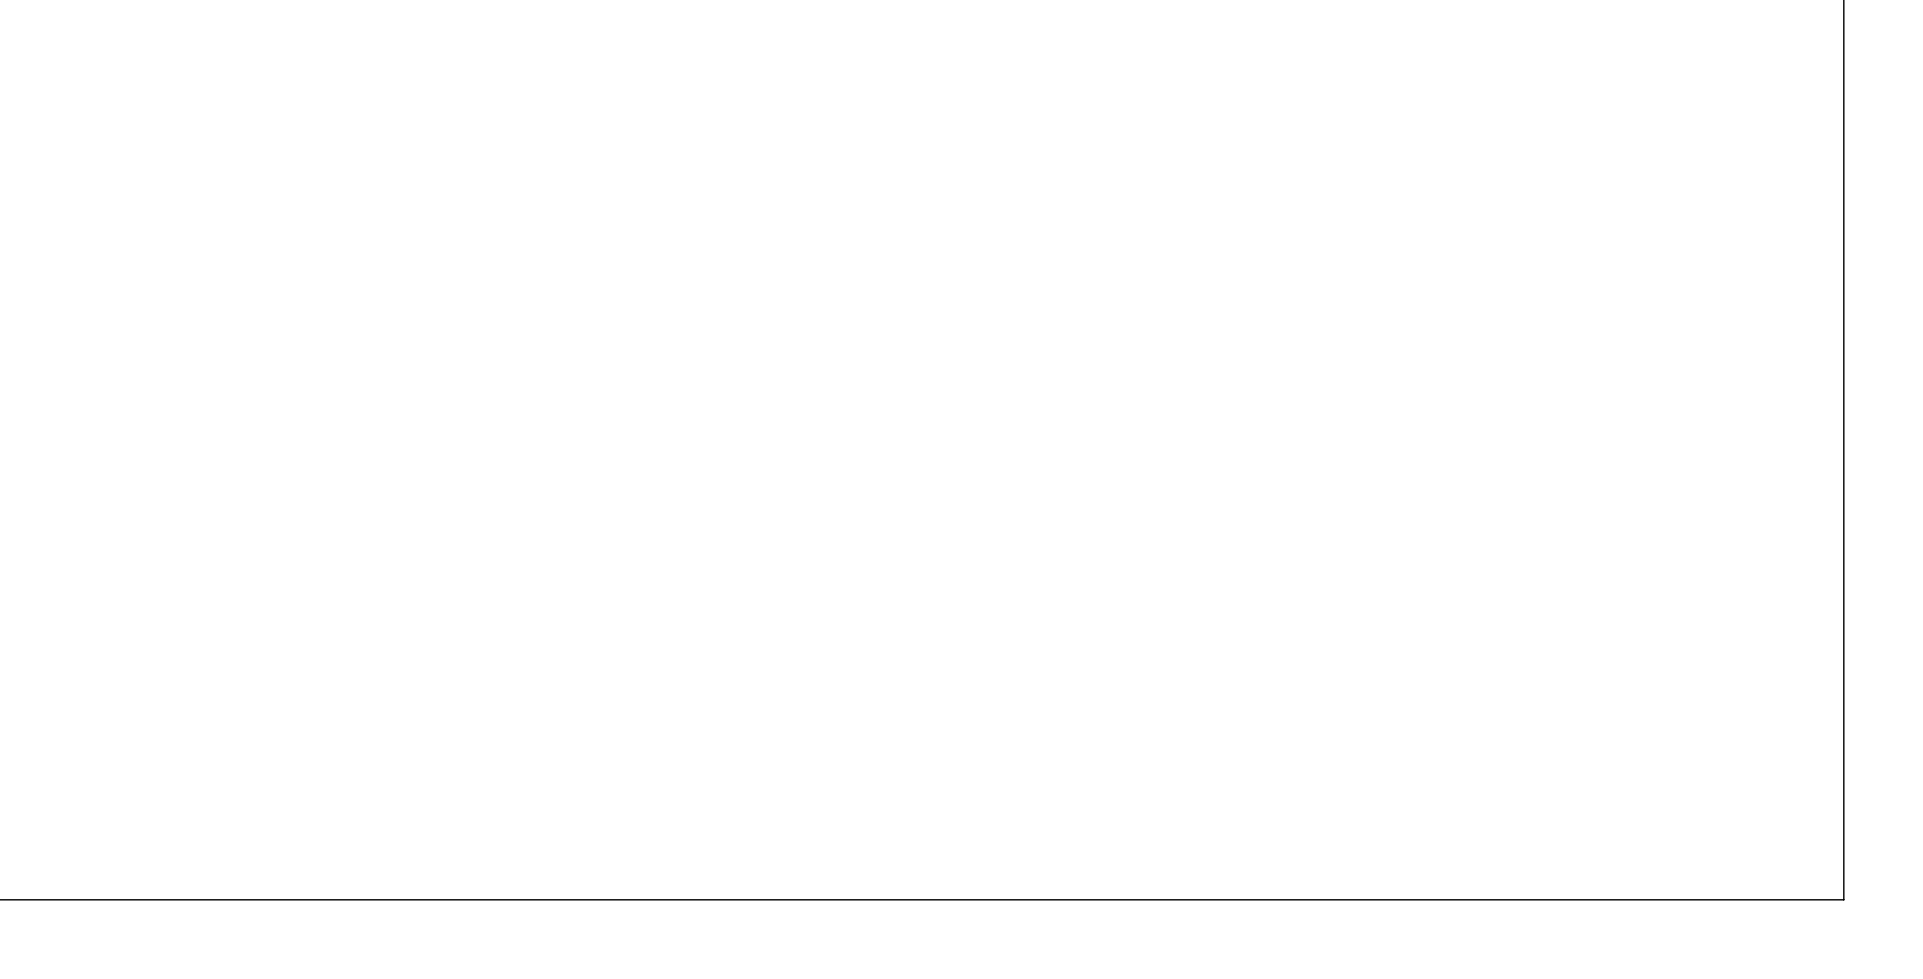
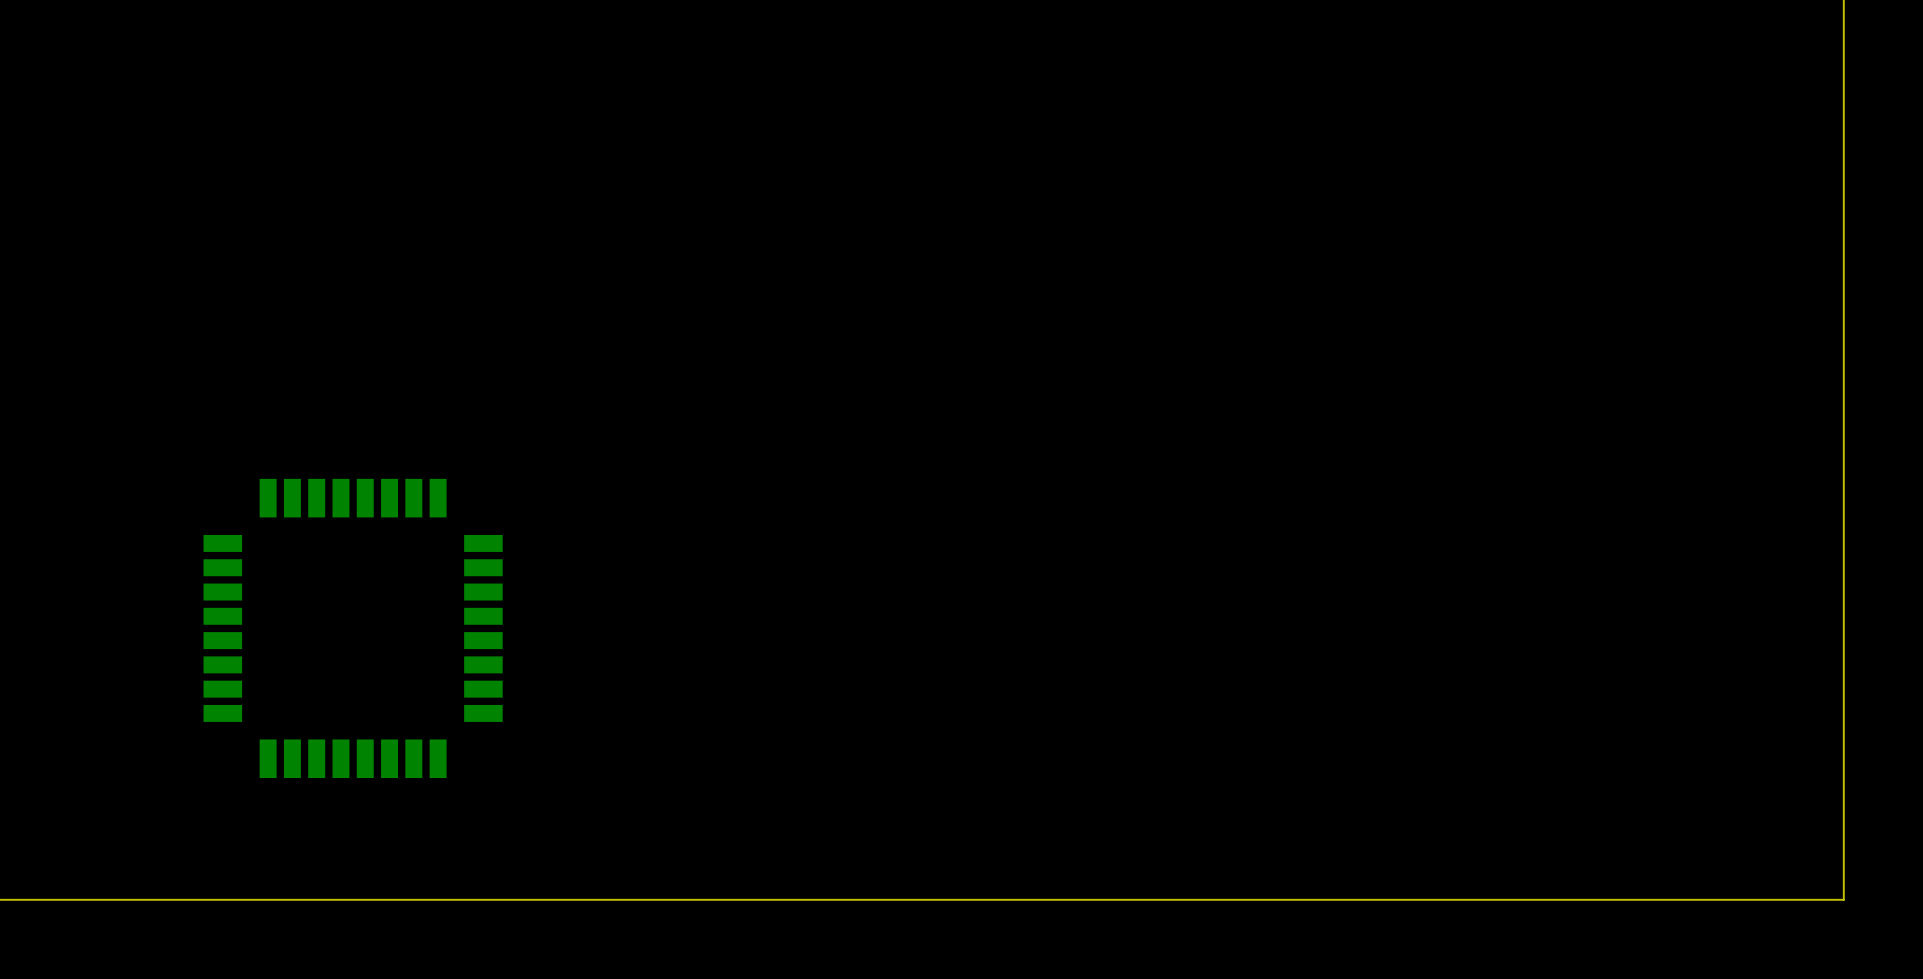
part: none -> (353, 628)

